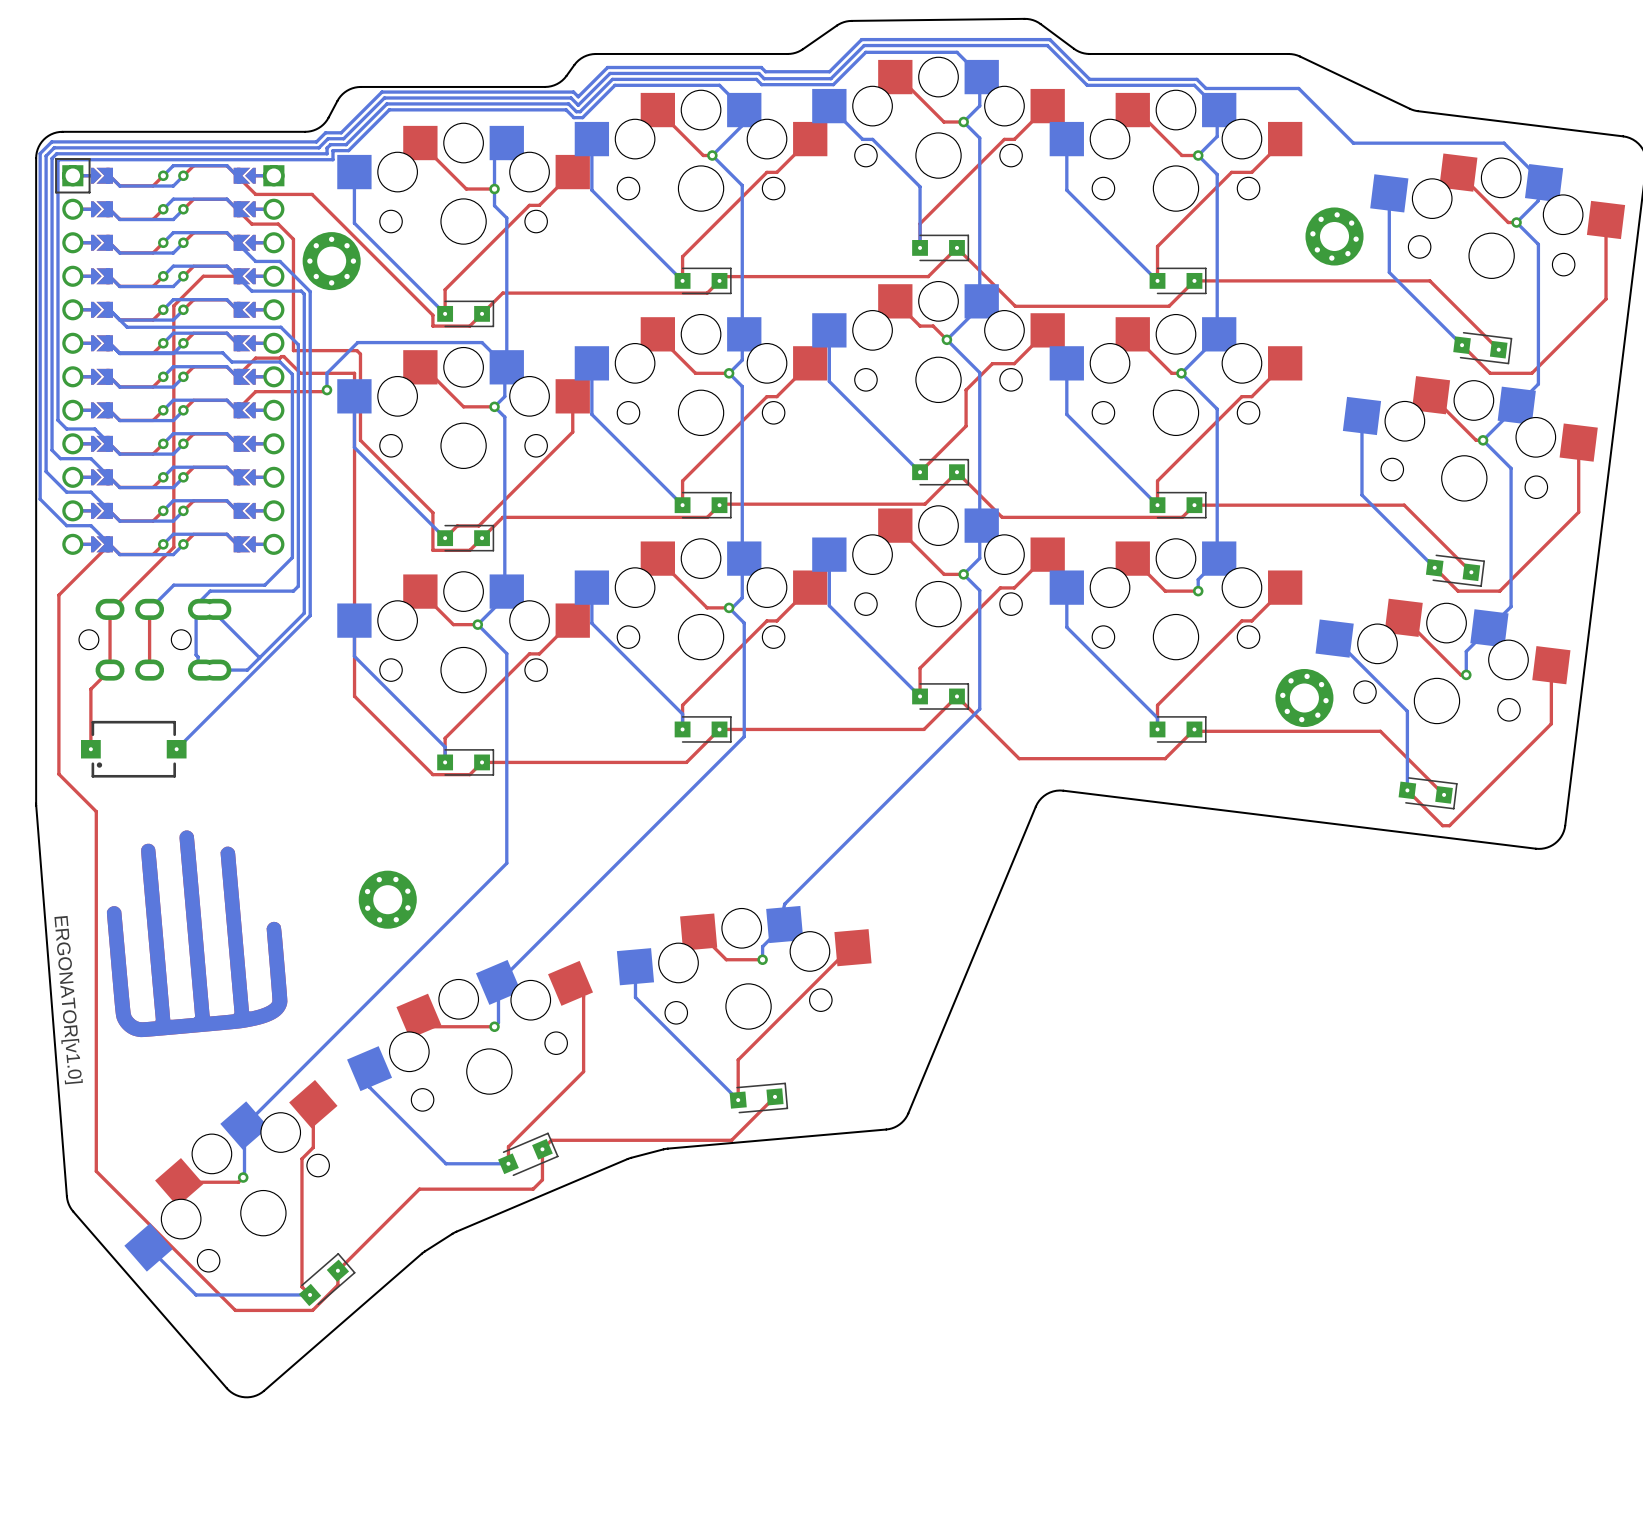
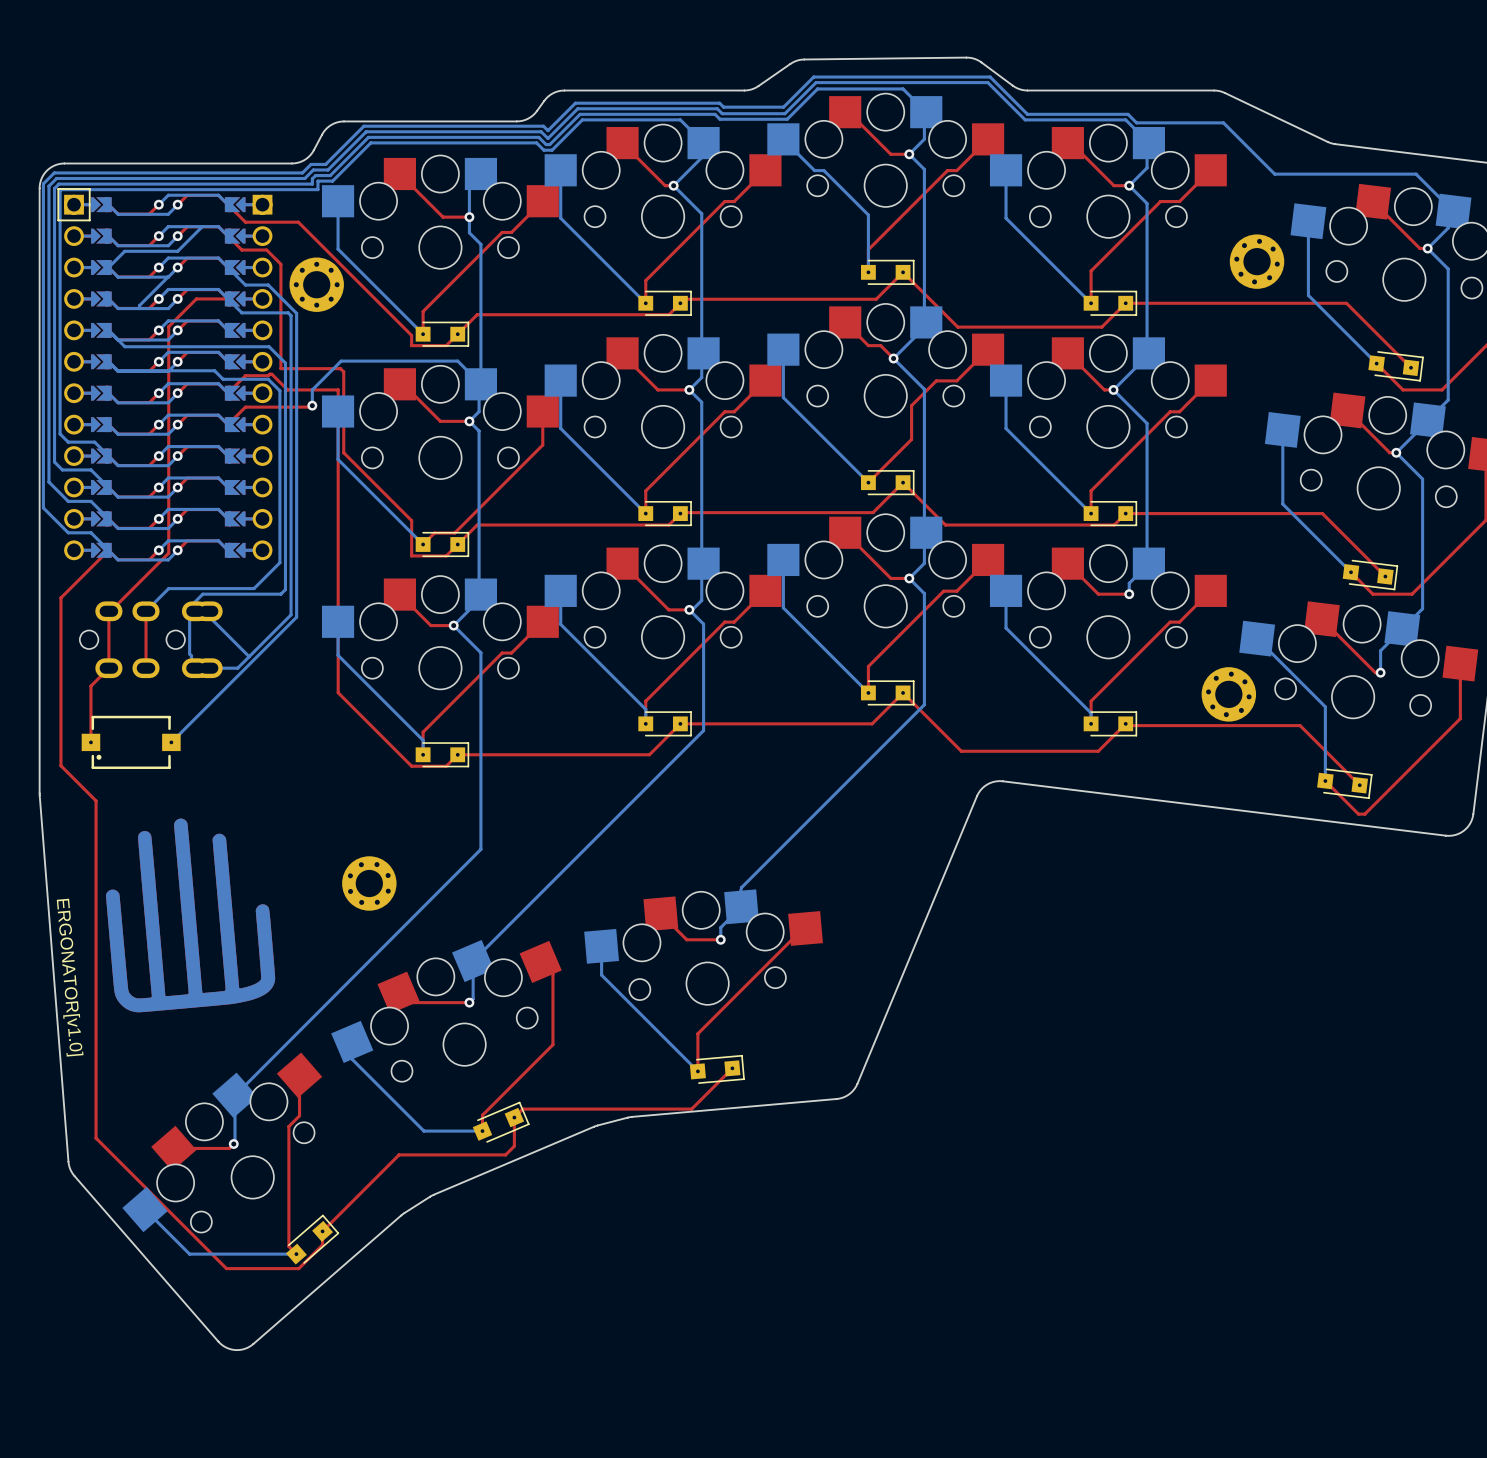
bottom track: none -> (202, 226) (177, 251) (124, 251) (108, 267)
bottom track: none -> (167, 277) (139, 305) (139, 308)

